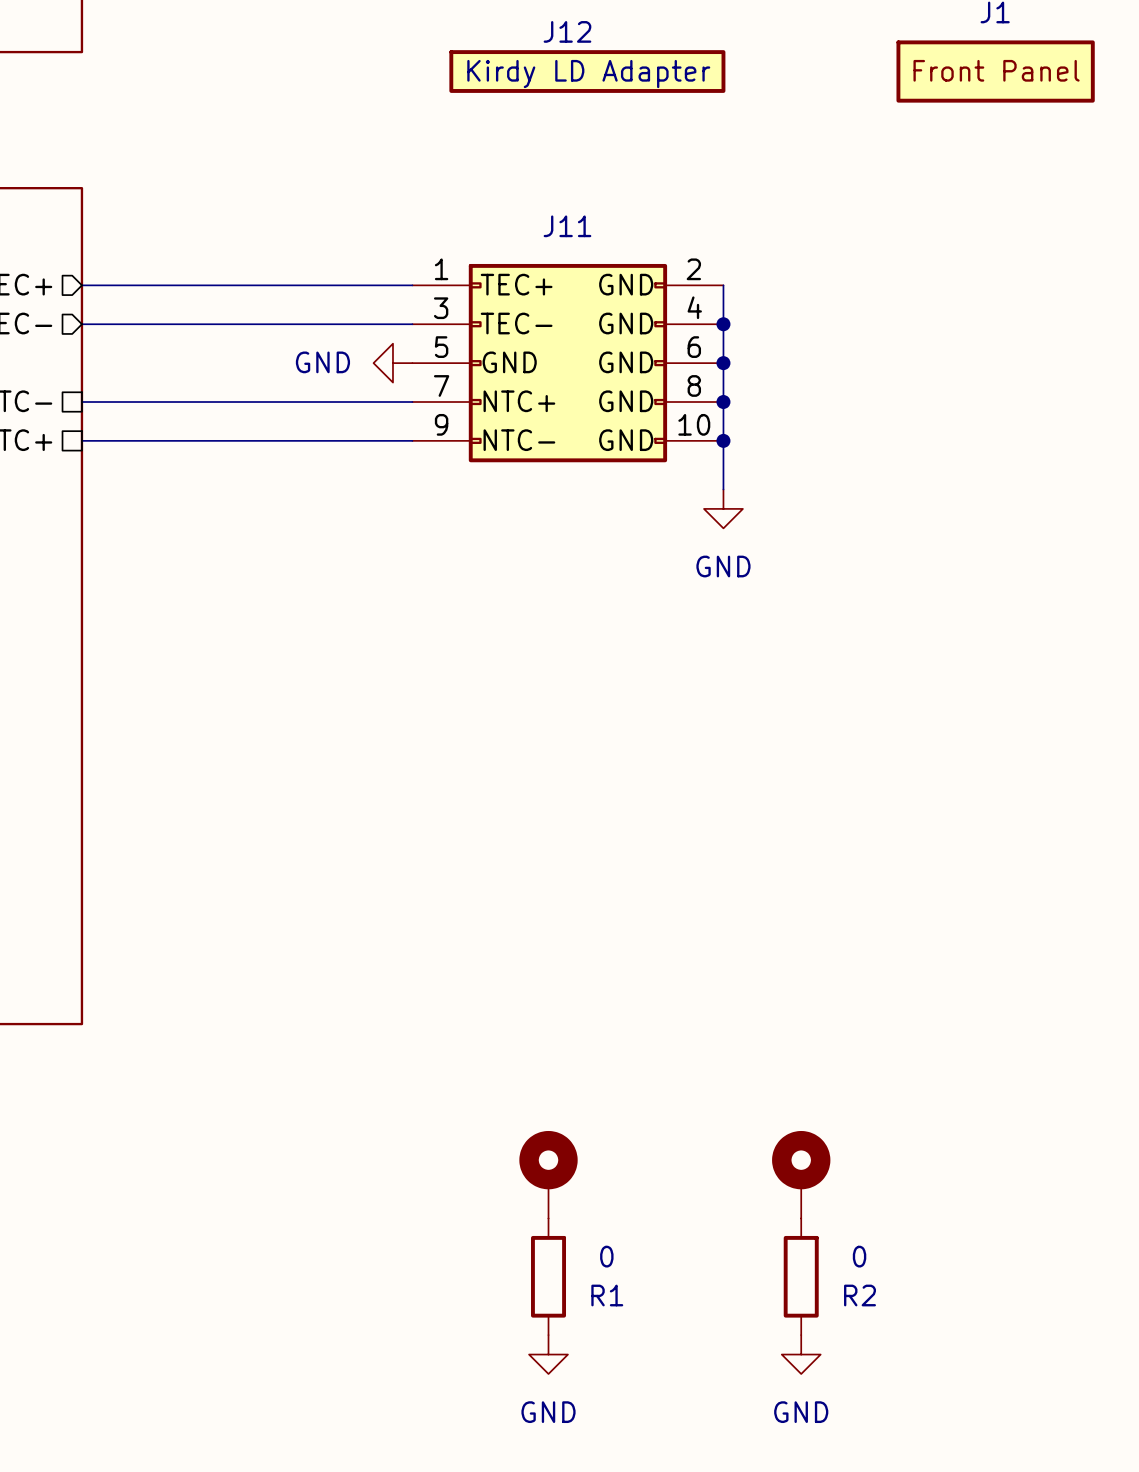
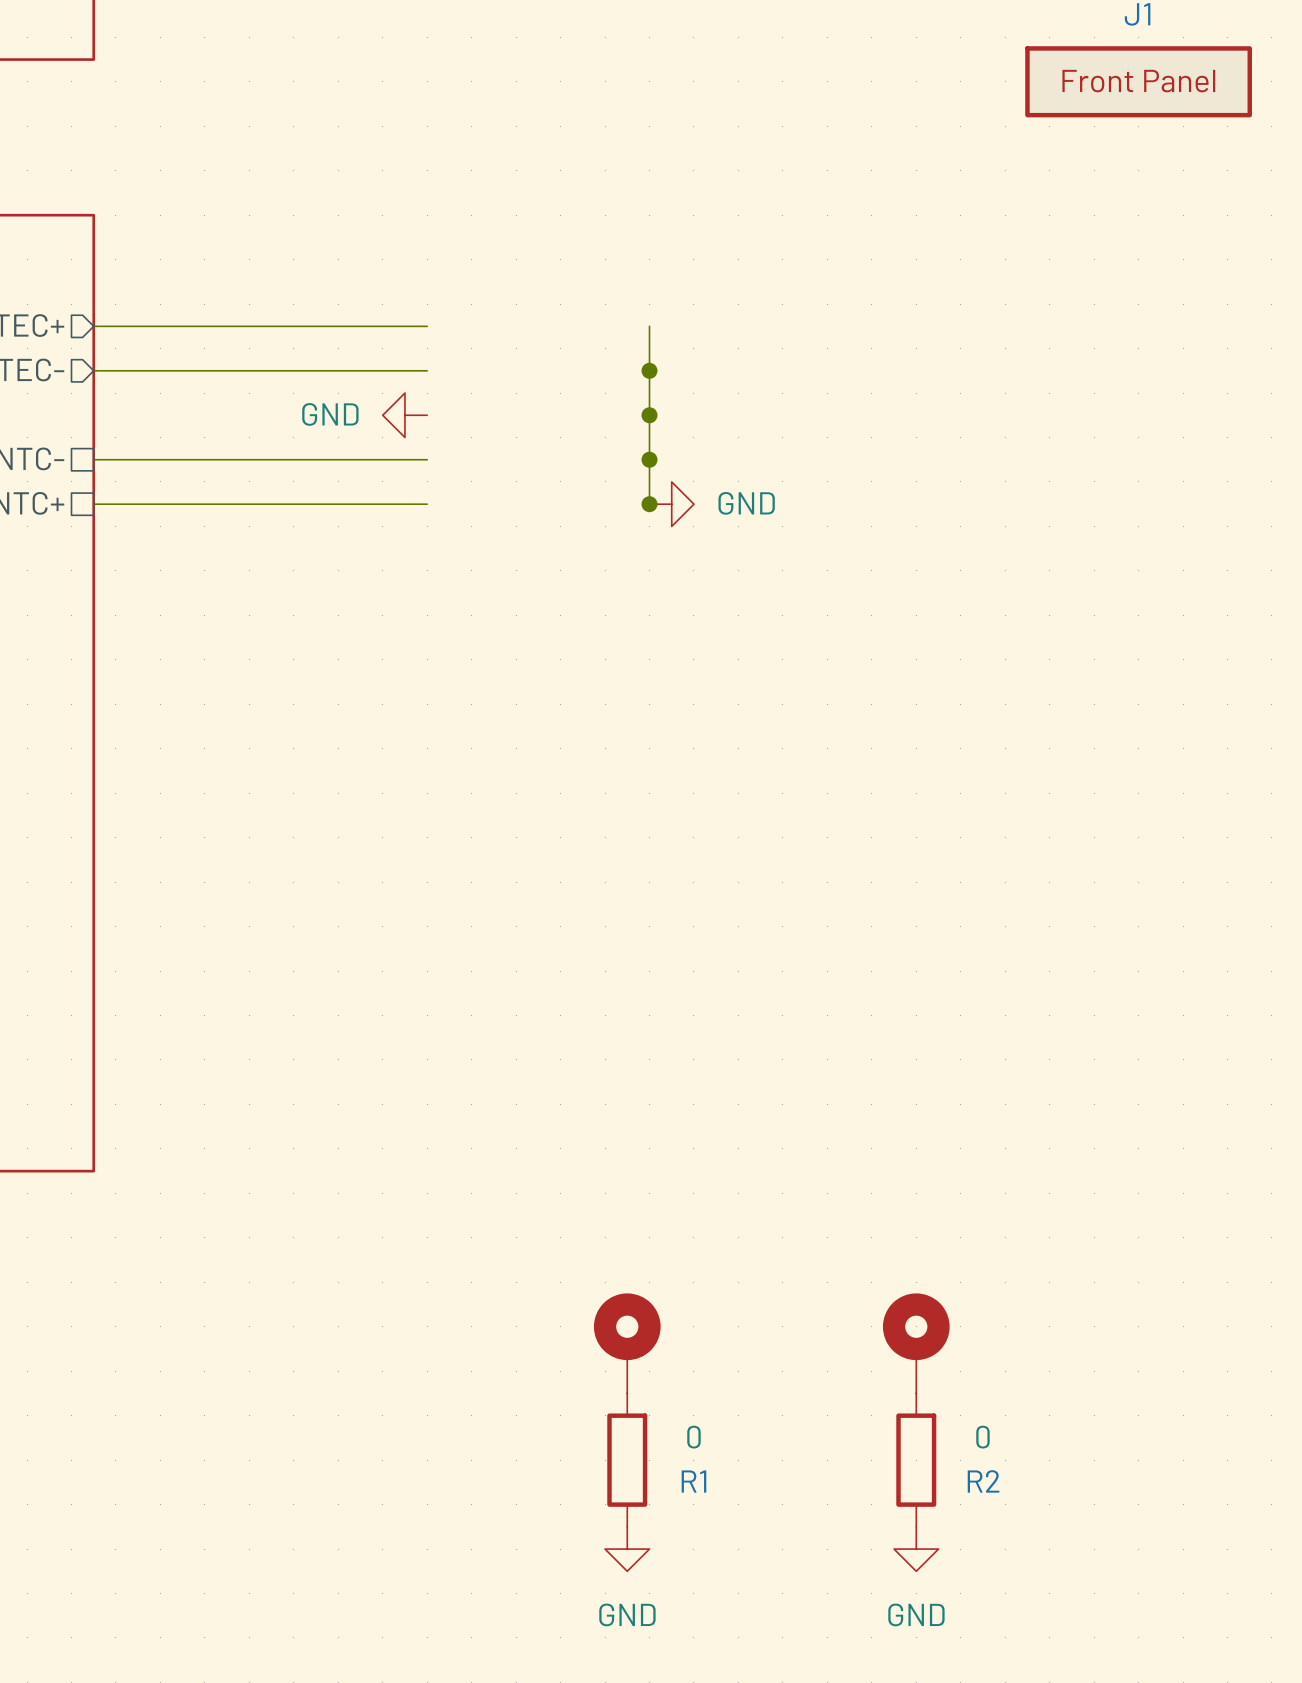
J12: Kirdy LD Adapter (587, 71) -> none
wire: (373, 285) (412, 285) -> none
wire: (723, 285) (723, 489) -> none
wire: (373, 324) (412, 324) -> none
junction: none -> (649, 370)
junction: (723, 324) -> none
power symbol position: GND (392, 363) -> GND (404, 415)
junction: none -> (649, 415)
J11: (567, 363) -> none
junction: (723, 363) -> none
wire: (373, 402) (412, 402) -> none
junction: none -> (649, 459)
junction: (723, 402) -> none
wire: (373, 440) (412, 440) -> none
junction: none -> (649, 504)
power symbol: none -> GND (671, 504)
junction: (723, 440) -> none
power symbol: GND (723, 508) -> none

